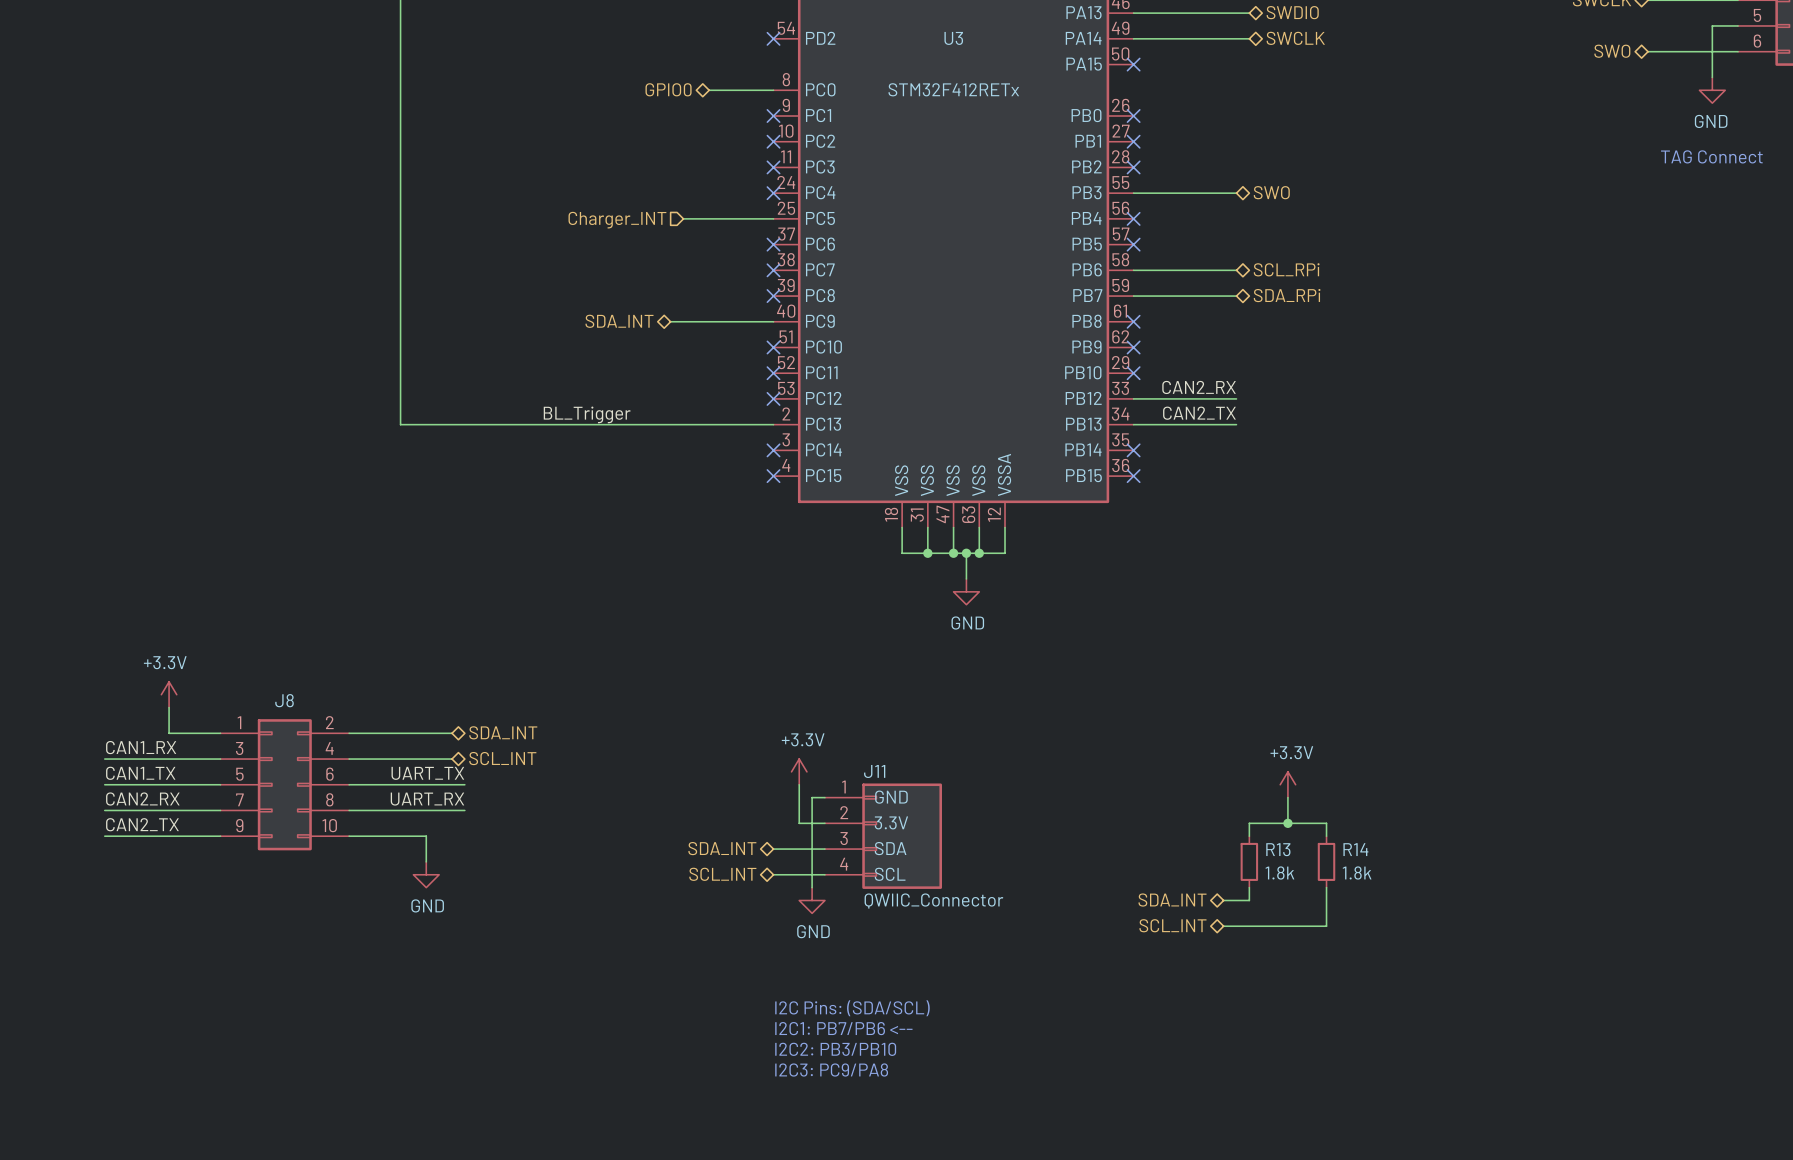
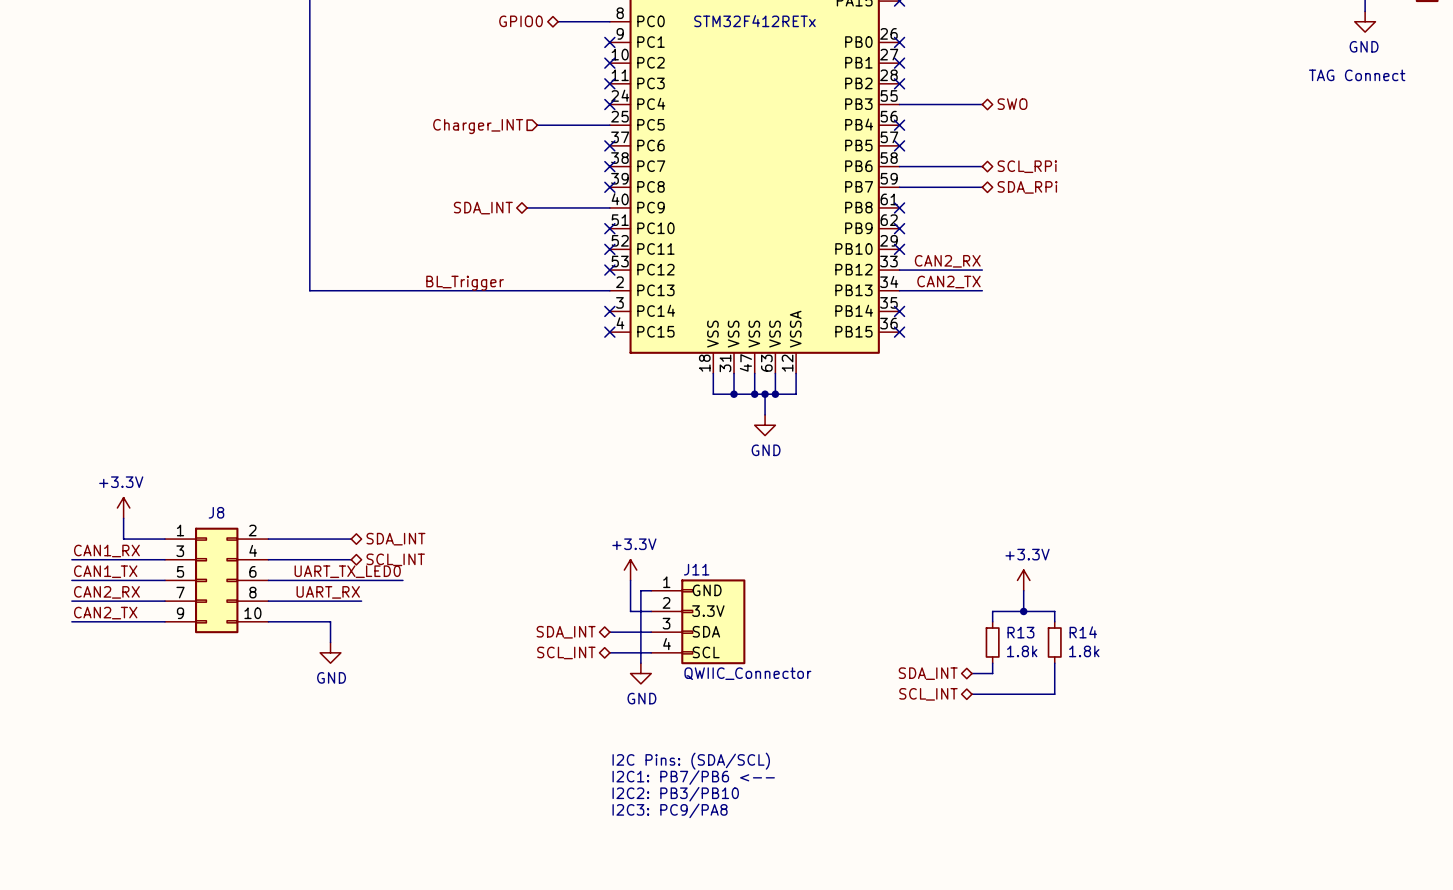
label: UART_TX (427, 773) -> UART_TX_LED0 (347, 571)
wire: none -> (361, 580) (402, 580)

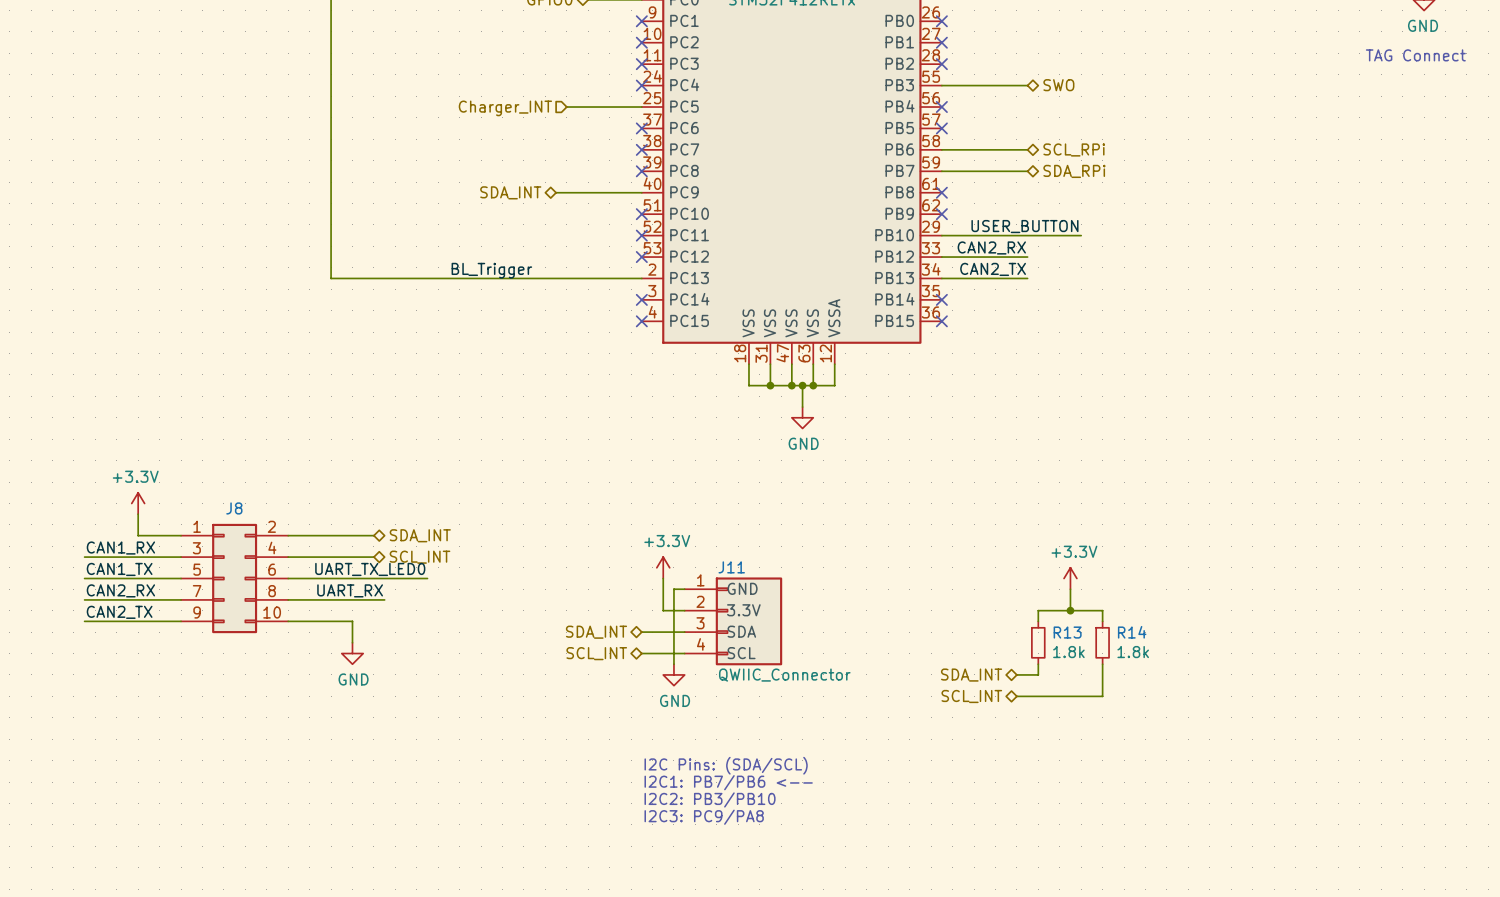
label: none -> USER_BUTTON (1024, 226)
wire: none -> (941, 235) (1081, 235)
no-connect mark: (899, 249) -> none

